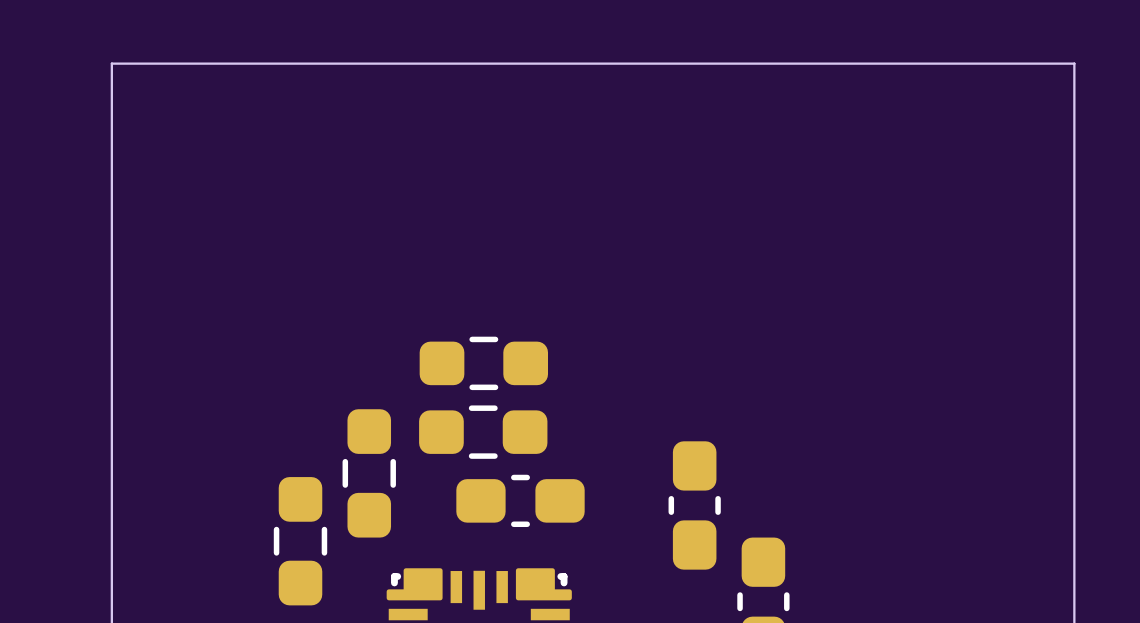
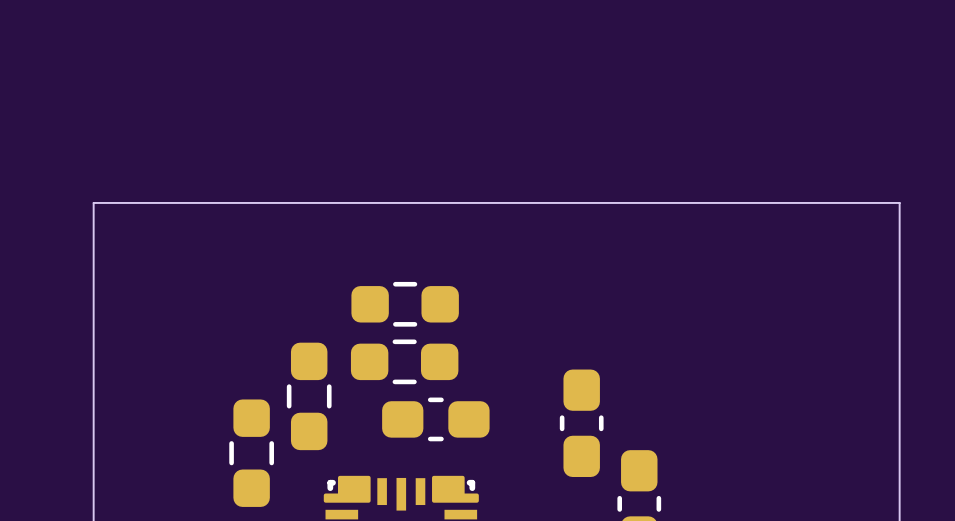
board edge: (111, 242) (111, 63) (1074, 63) (1074, 242) -> (93, 202) (899, 202)

